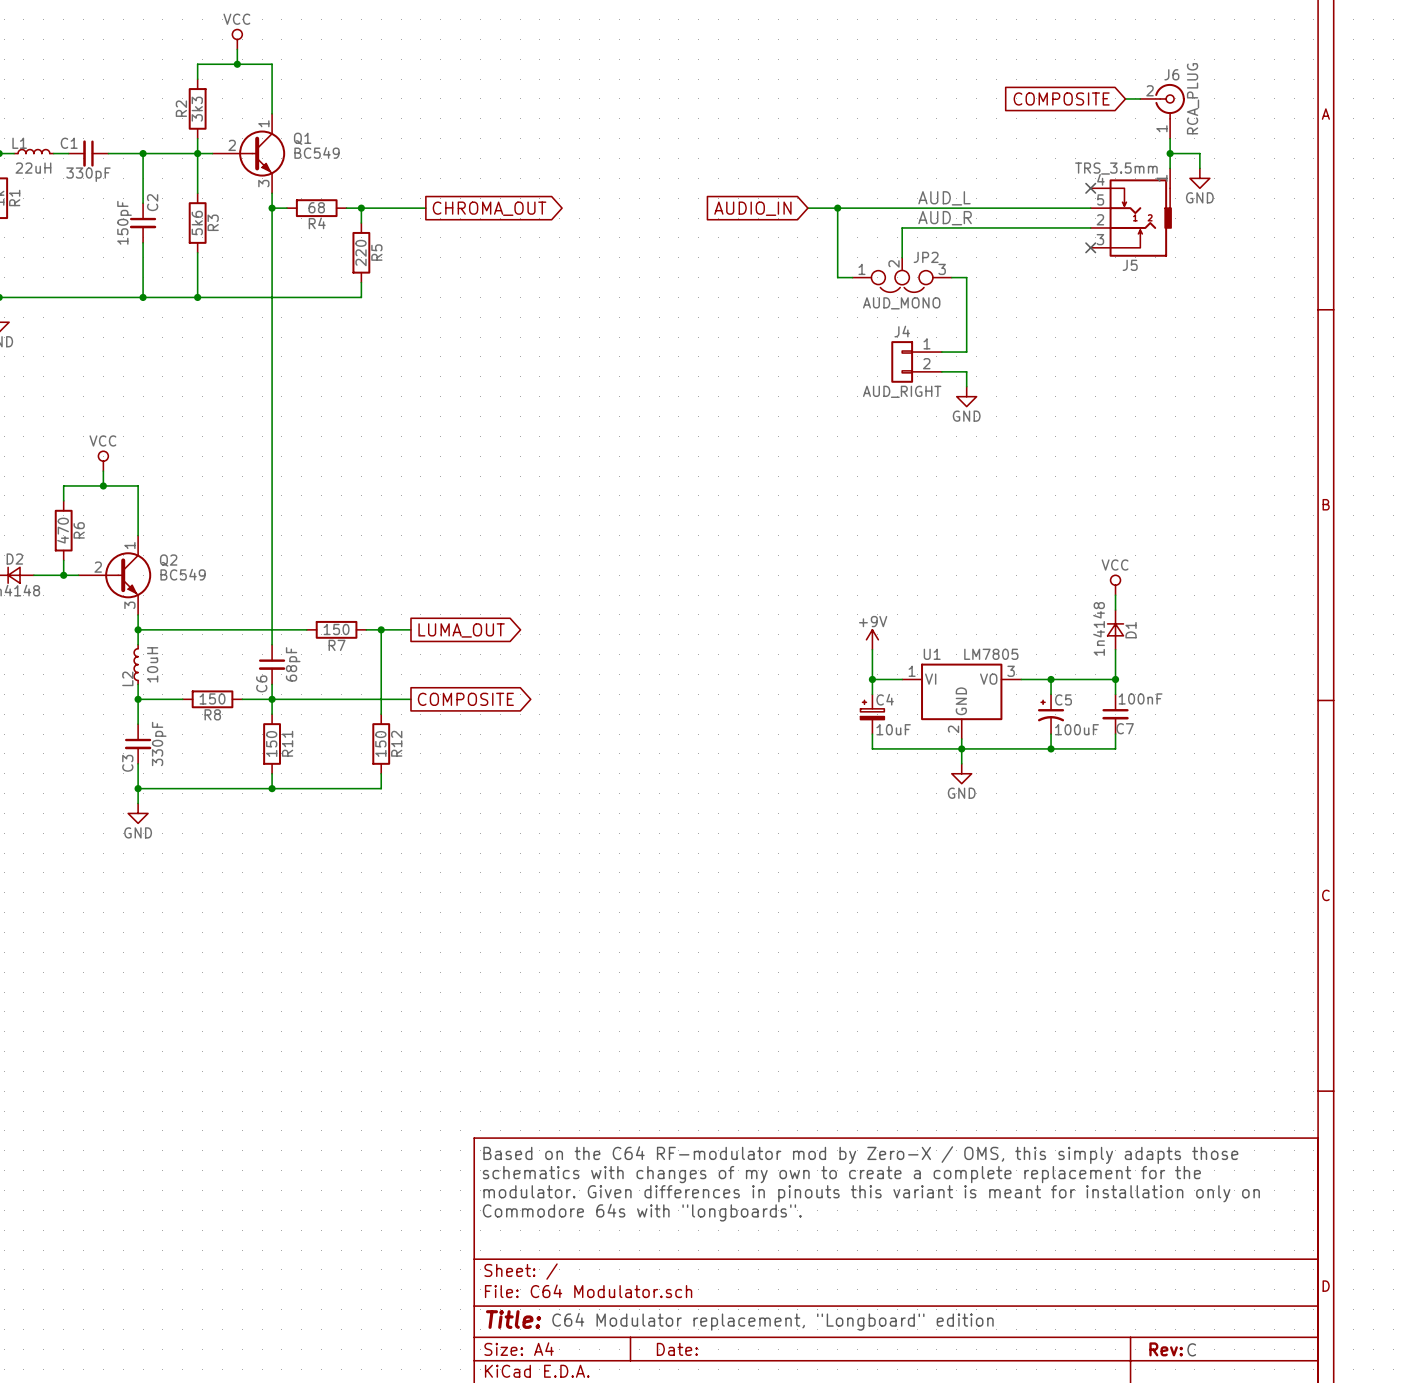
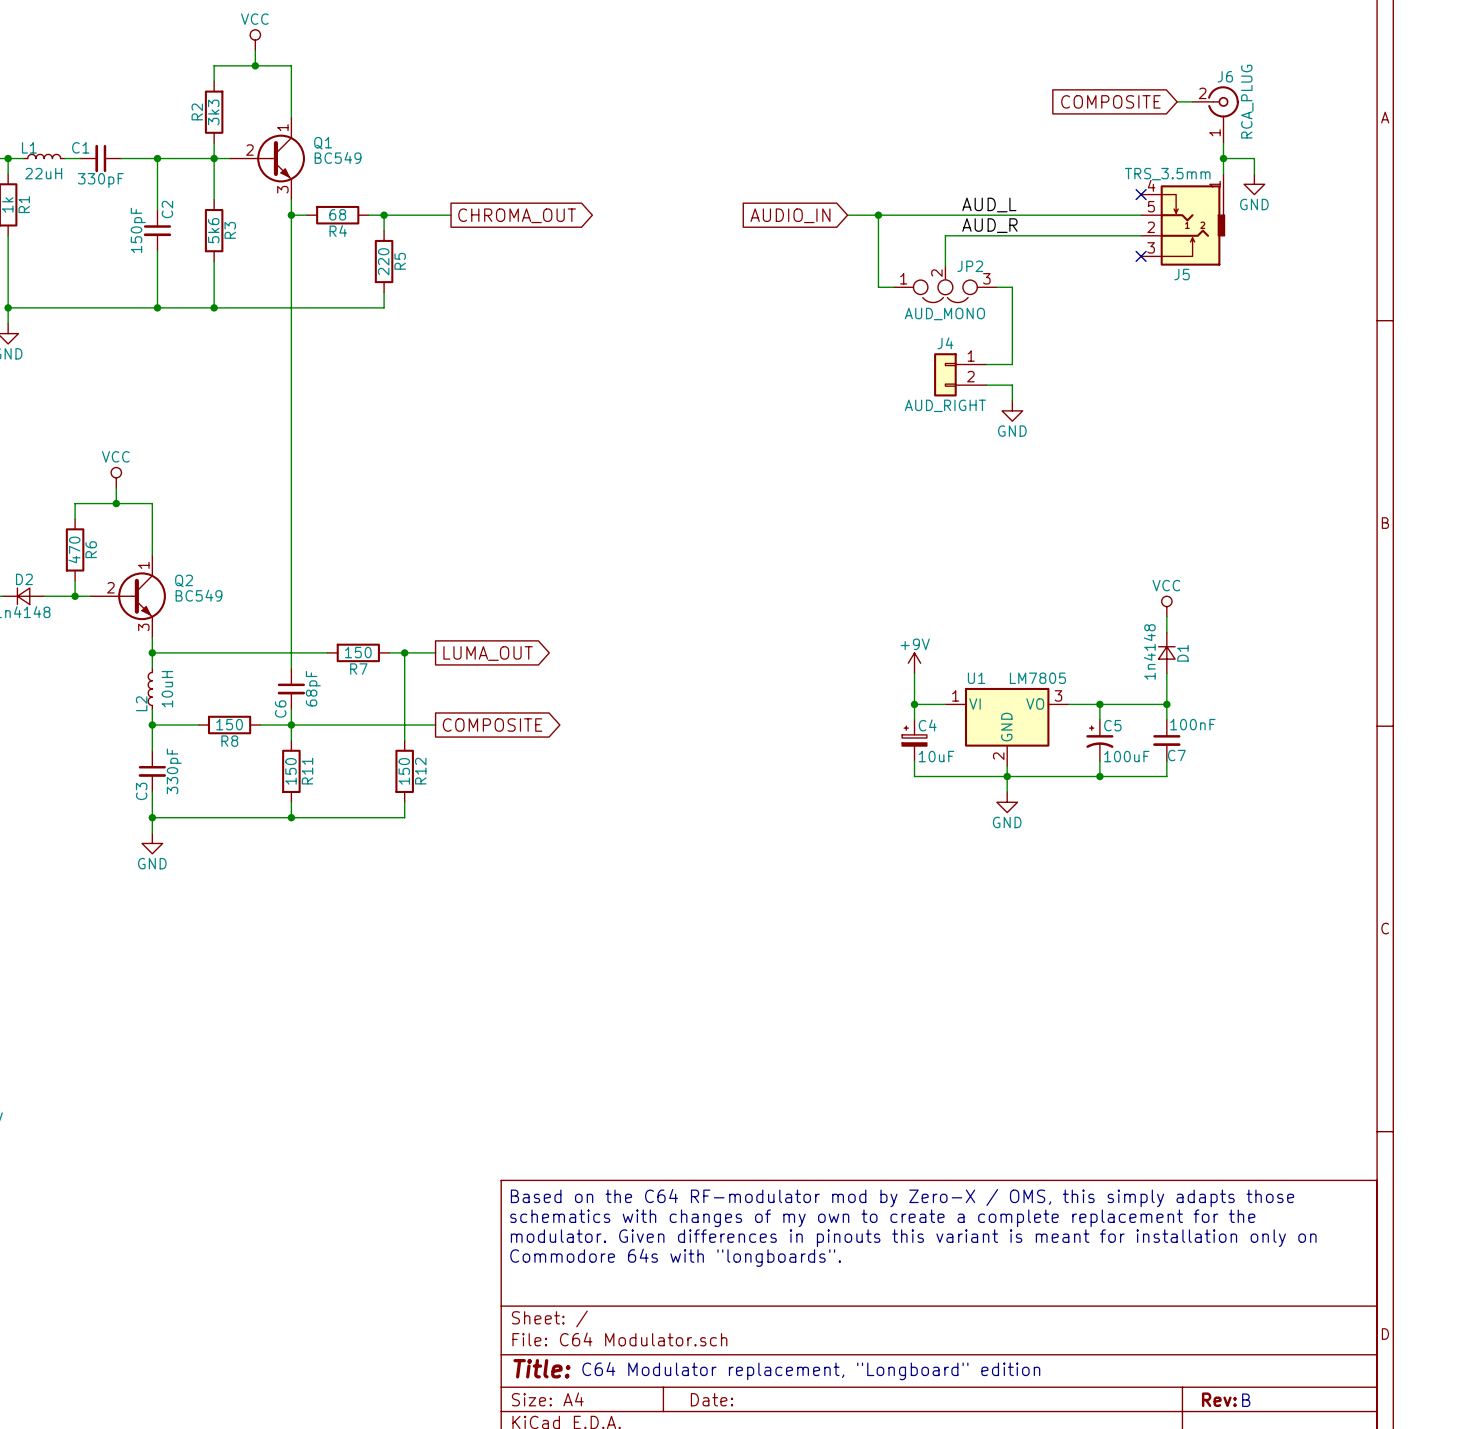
text: C (1191, 1349) -> B (1246, 1400)

